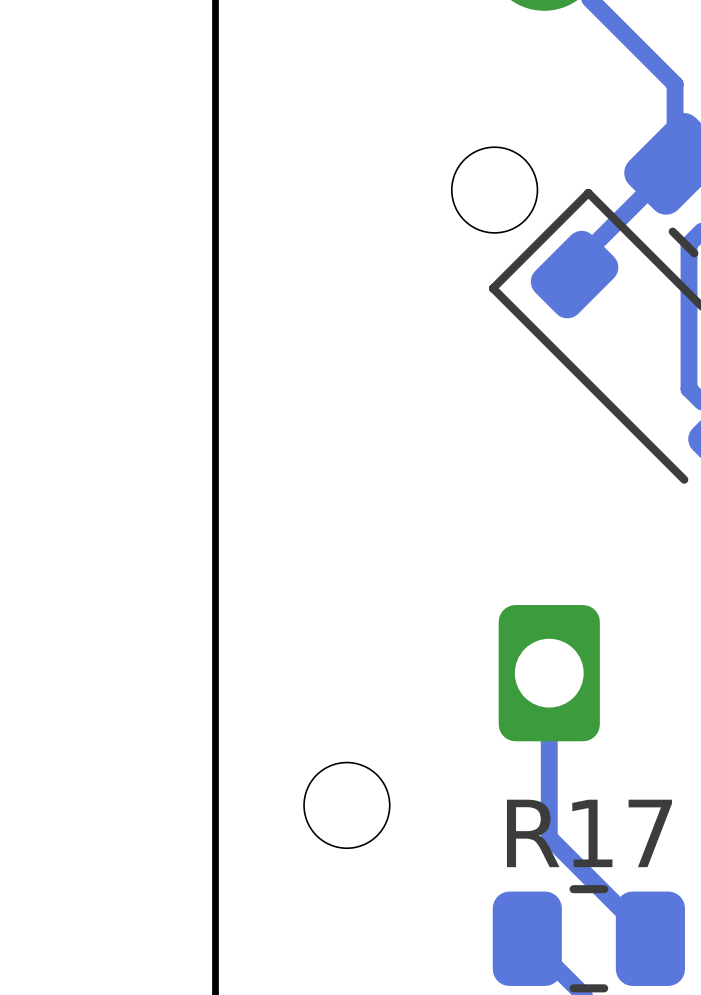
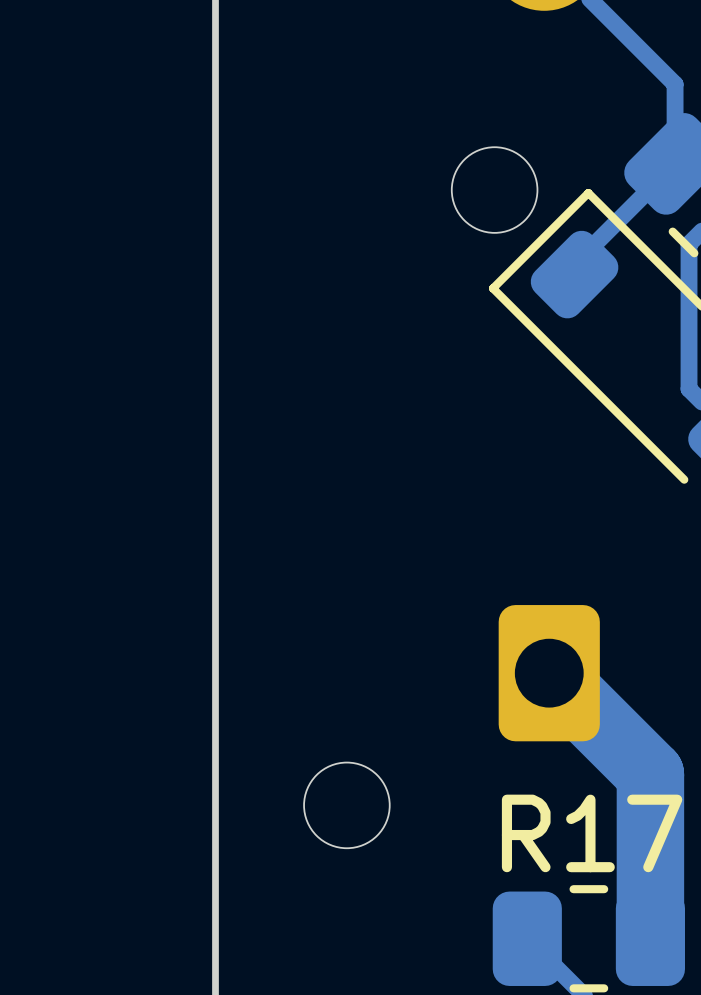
track: (549, 673) (549, 837) (650, 938) -> (549, 673) (650, 774) (650, 938)

